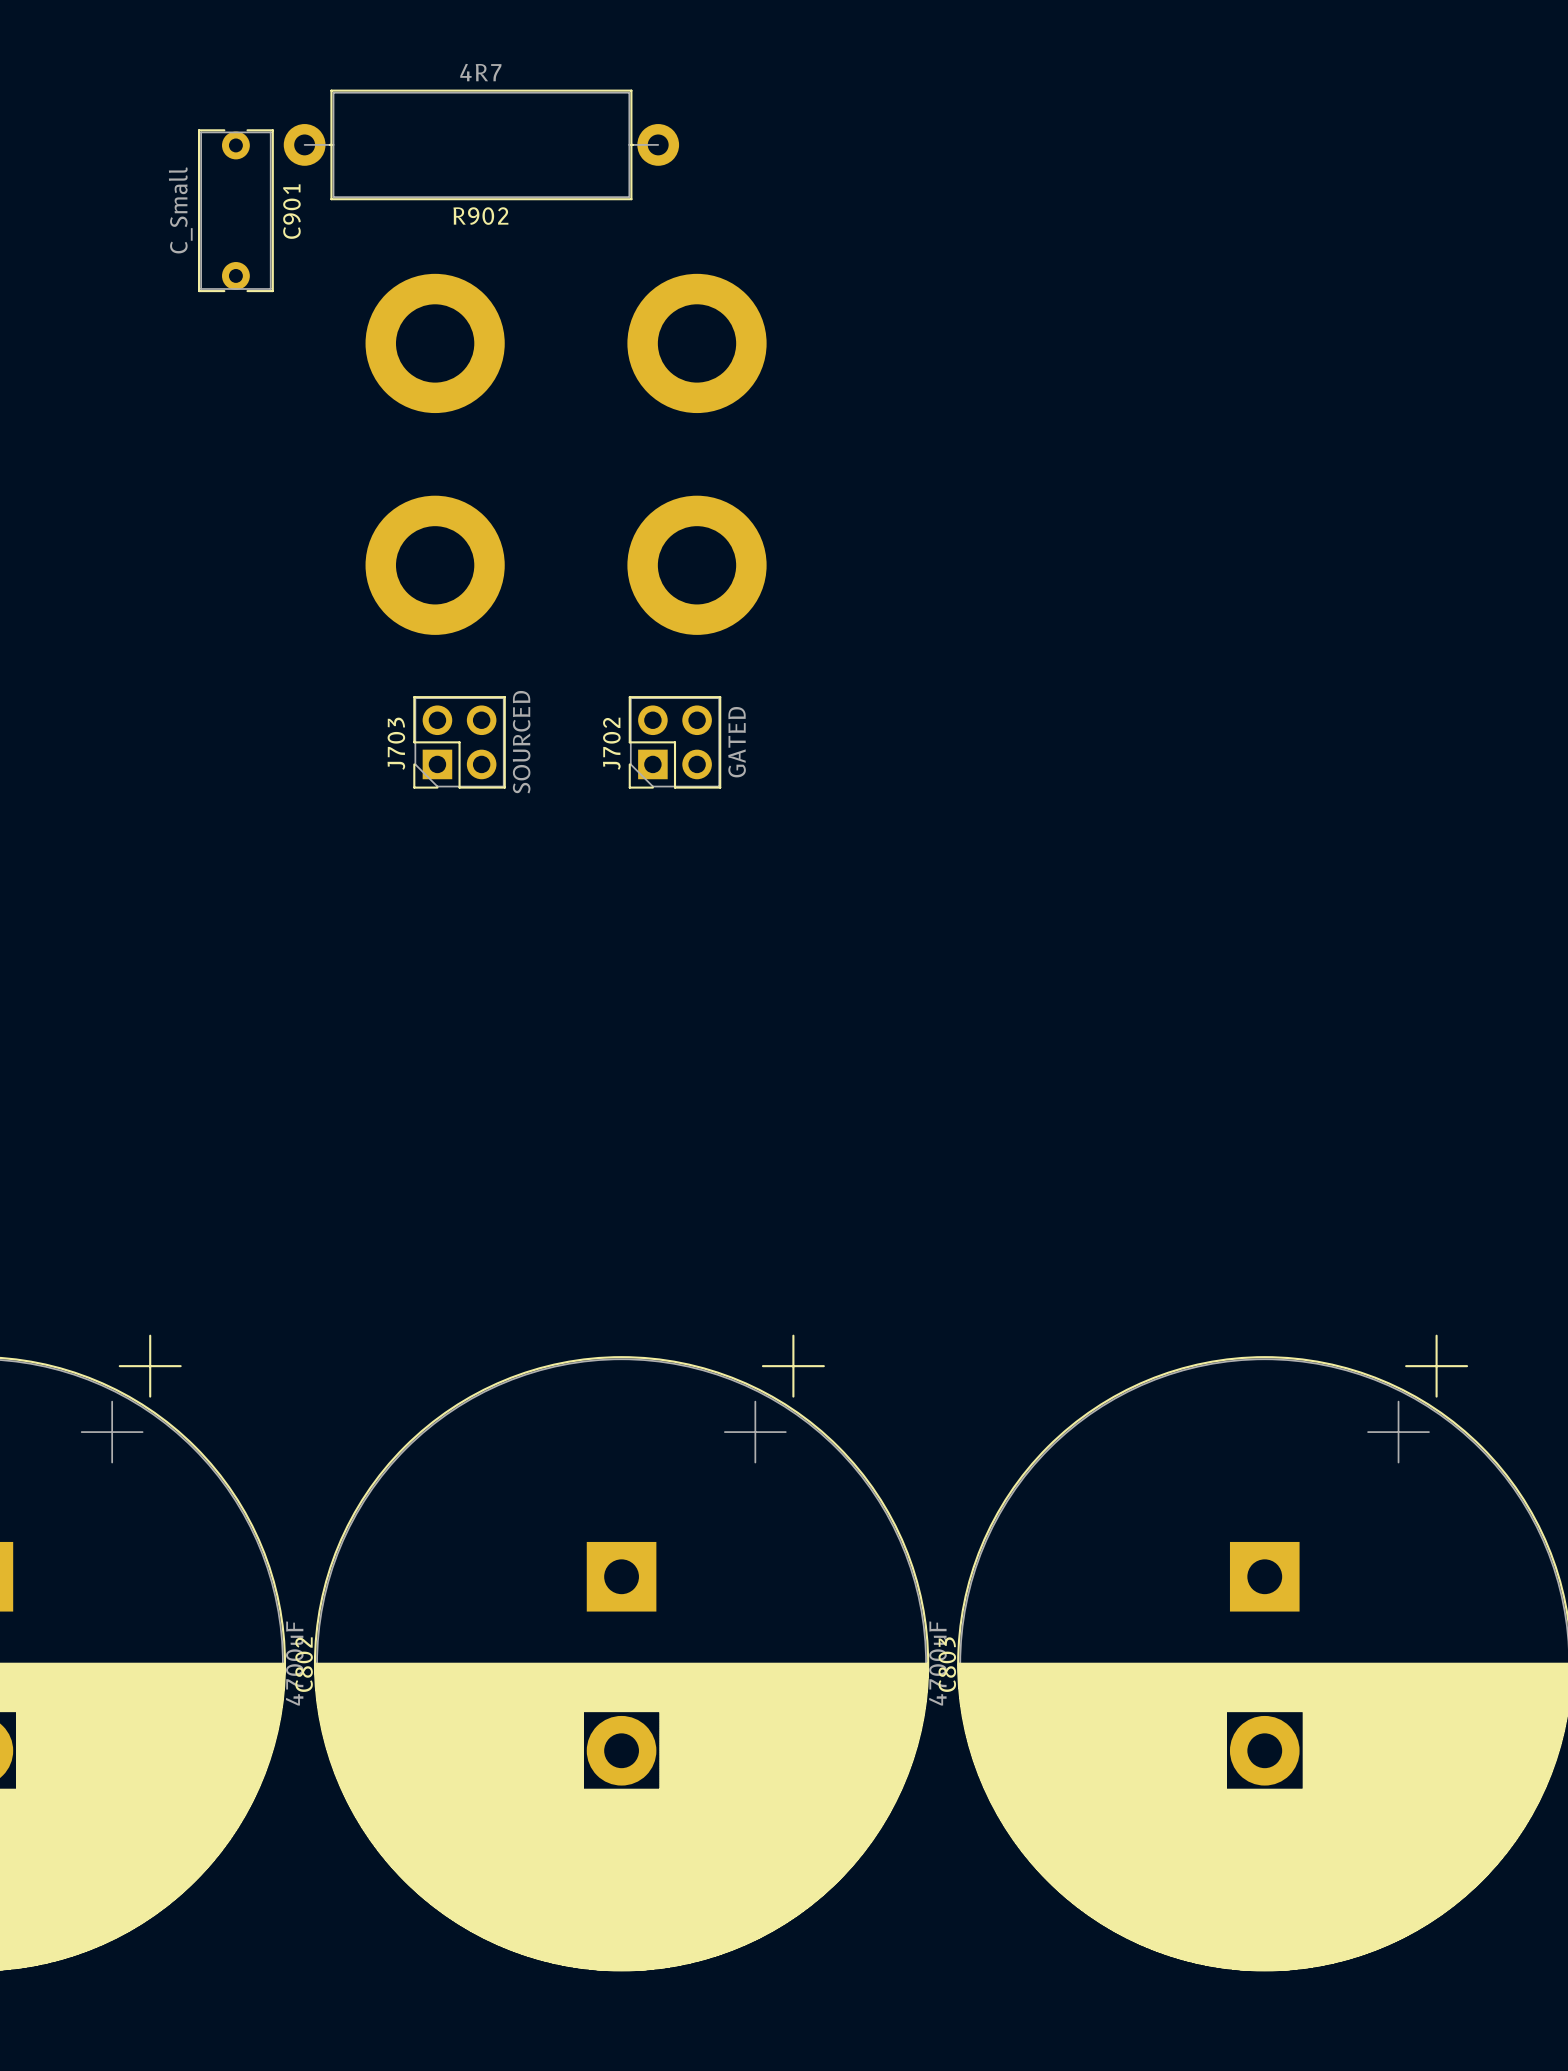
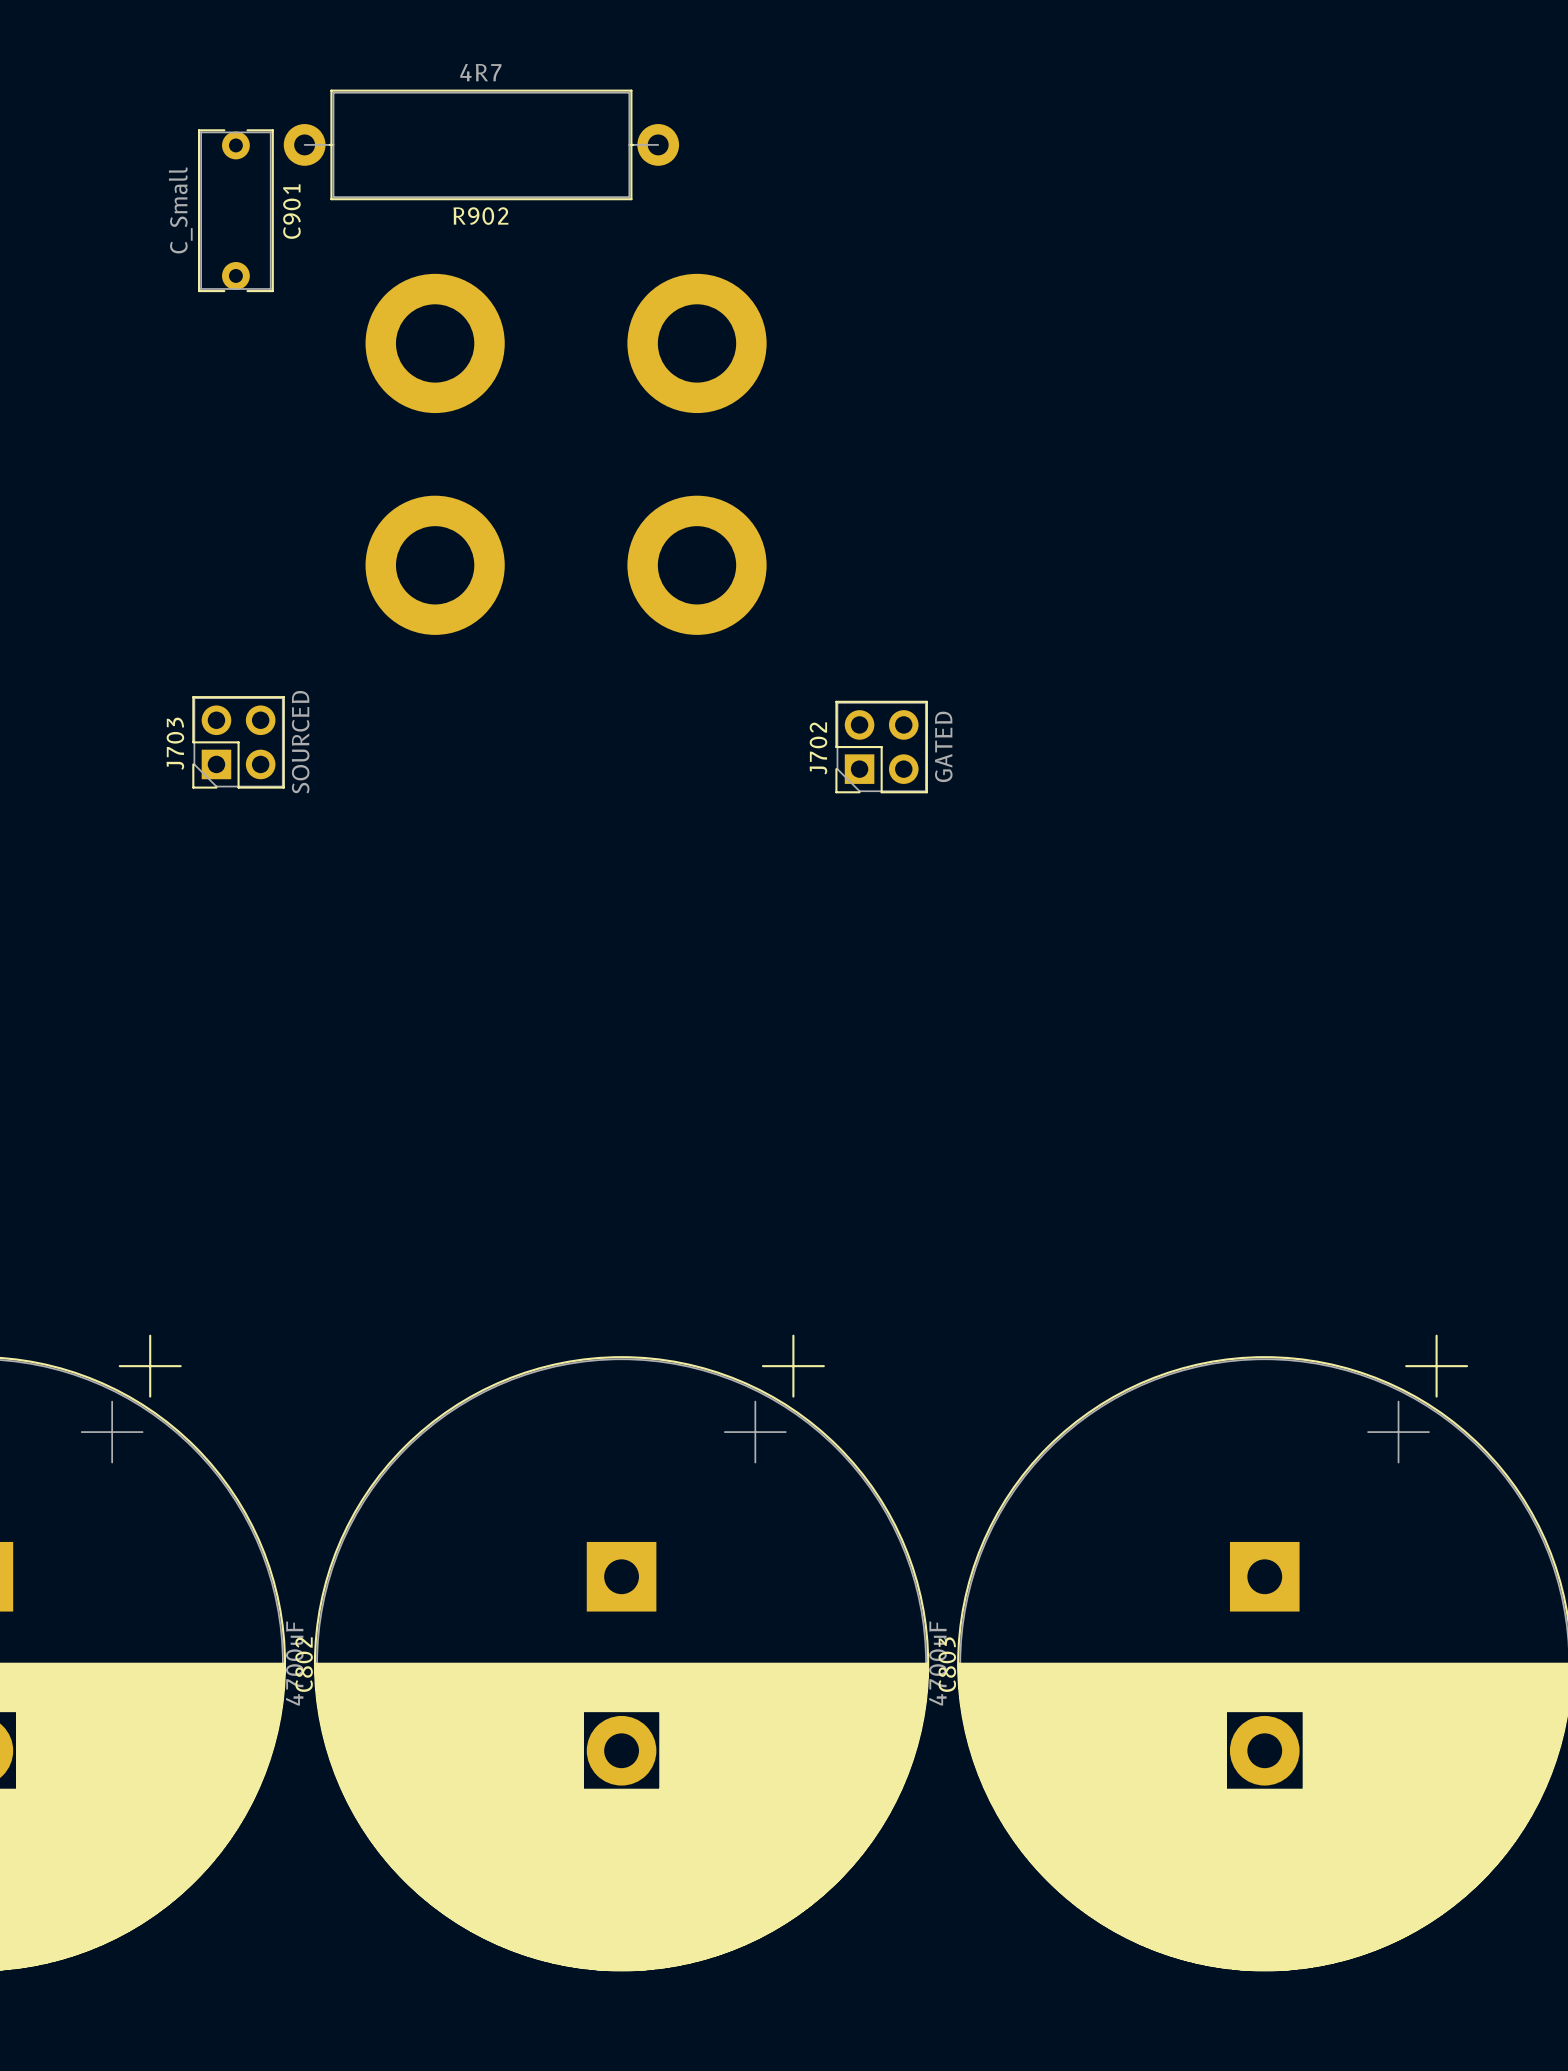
J703 position: (459, 742) -> (238, 742)
J702 position: (675, 742) -> (881, 747)

